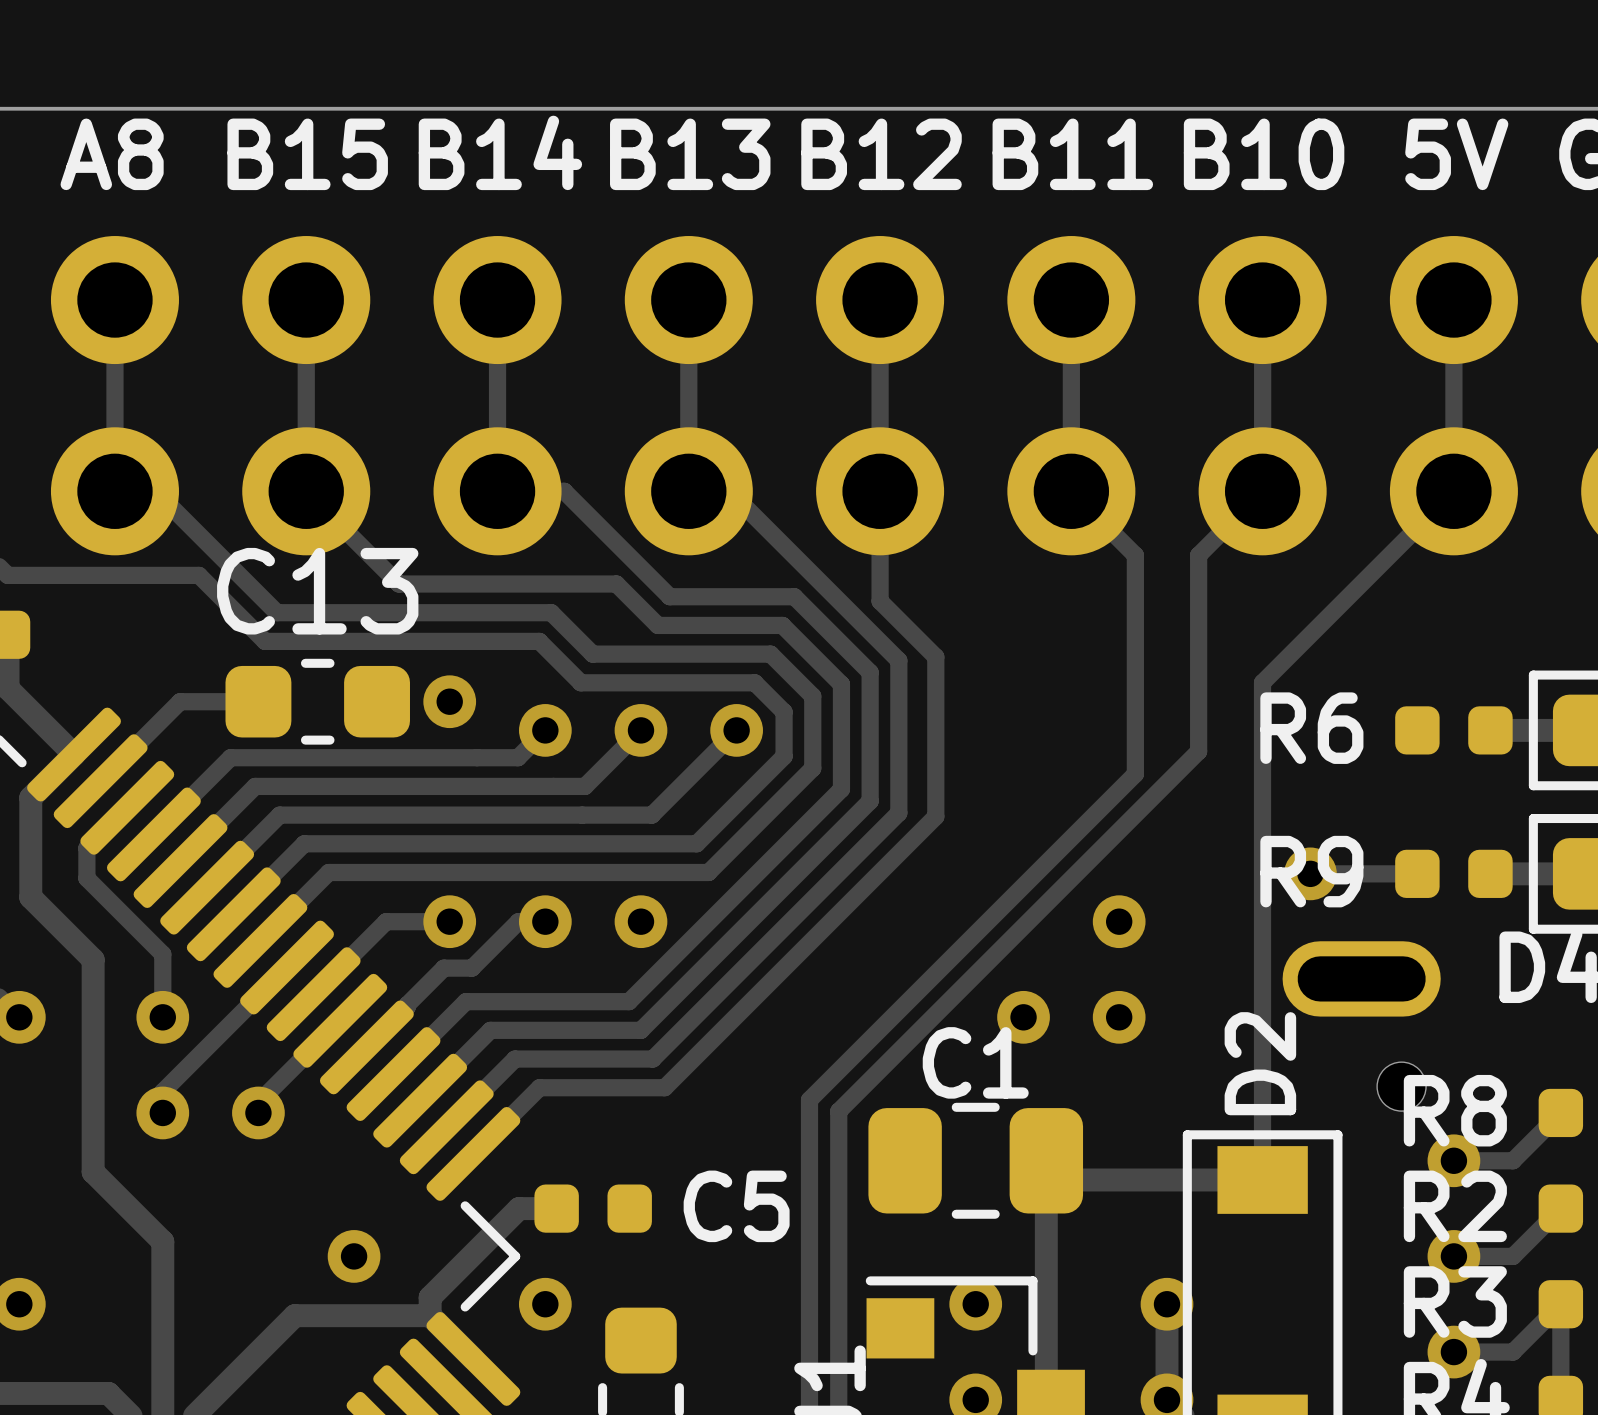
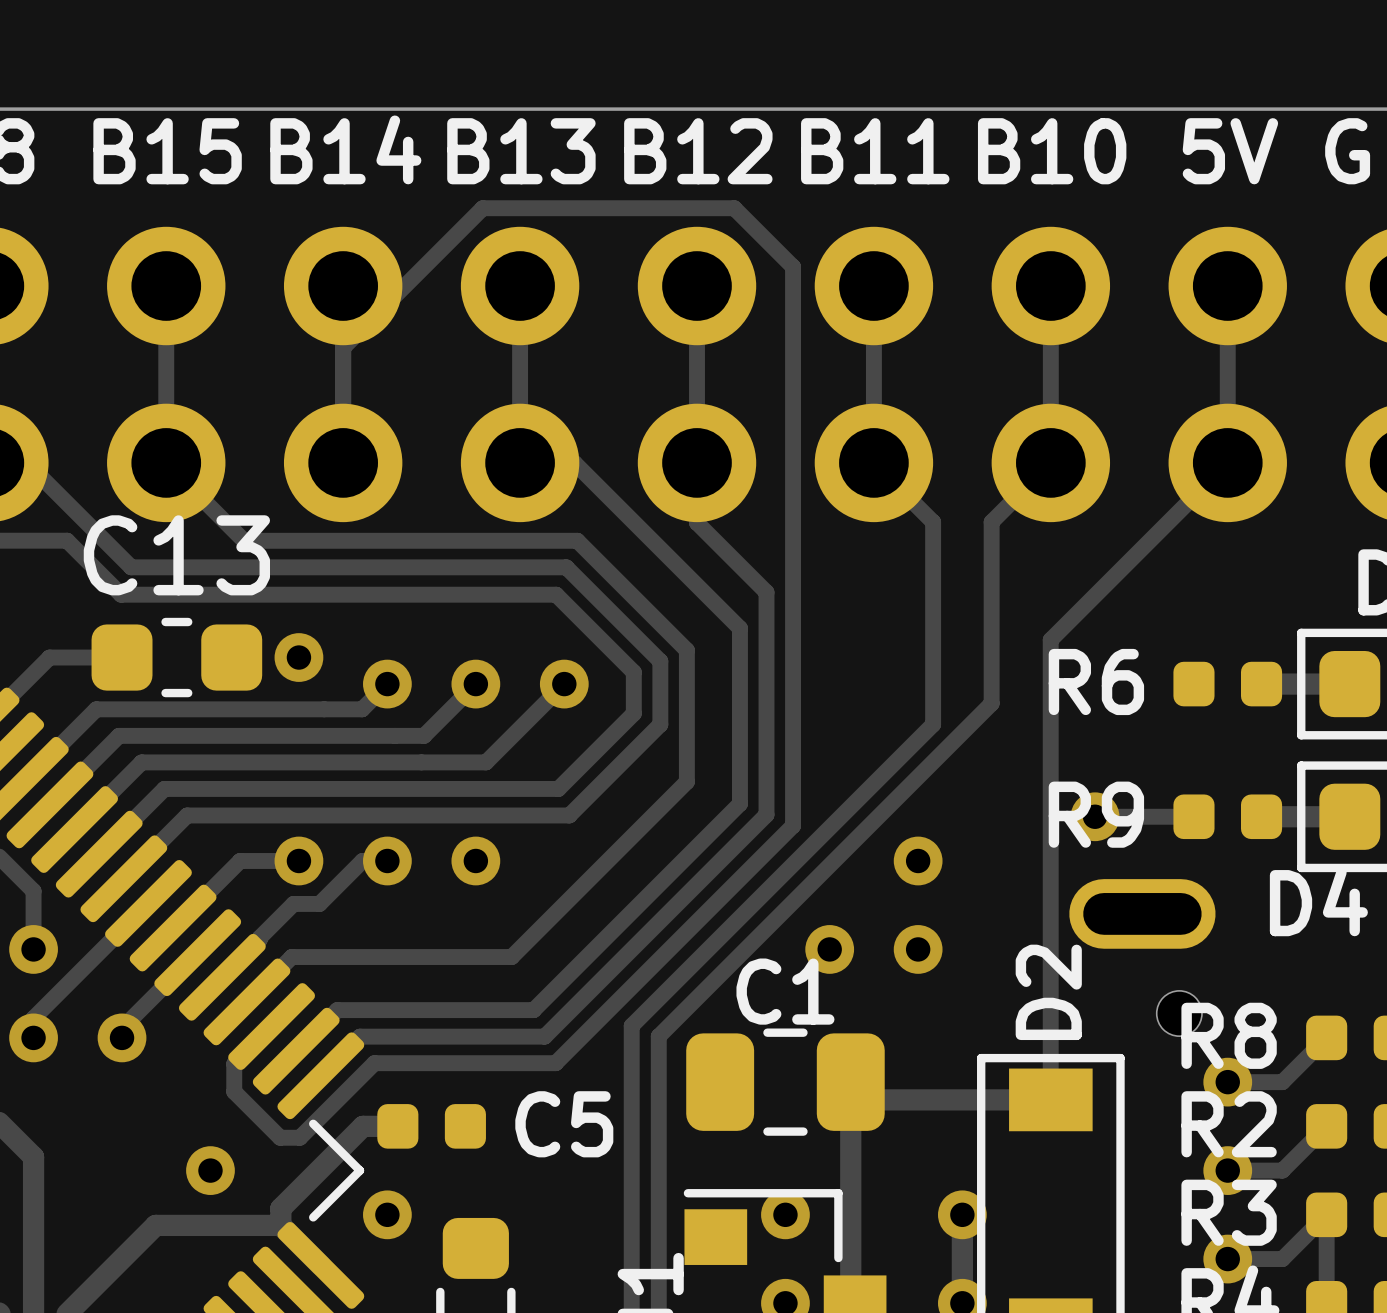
track: (497, 491) (564, 491) (669, 596) (794, 596) (870, 672) (870, 801) (640, 1030) (490, 1030) (420, 1100) -> (343, 347) (482, 208) (734, 208) (793, 266) (793, 825) (555, 1063) (374, 1063) (299, 1137) (280, 1137) (234, 1091) (234, 1063) (271, 1026)
track: (729, 491) (898, 660) (898, 813) (652, 1059) (515, 1059) (491, 1082) -> (557, 462) (574, 462) (739, 628) (739, 803) (533, 1010) (337, 1010)
track: (880, 556) (880, 601) (935, 656) (935, 816) (664, 1087) (539, 1087) (515, 1111) -> (697, 522) (766, 592) (766, 814) (544, 1036) (359, 1036)
track: (390, 575) (398, 584) (616, 584) (657, 625) (782, 625) (841, 684) (841, 789) (629, 1001) (465, 1001) (442, 1025) -> (244, 540) (577, 540) (686, 650) (686, 781) (511, 957) (291, 957)
track: (268, 604) (276, 612) (551, 612) (592, 654) (770, 654) (812, 696) (812, 768) (708, 872) -> (131, 567) (566, 567) (660, 661) (660, 724) (569, 815) (538, 815)
track: (257, 633) (265, 641) (539, 641) (580, 682) (754, 682) (784, 712) (784, 756) (696, 843) -> (121, 594) (556, 594) (633, 672) (633, 713) (558, 788) (527, 788)

